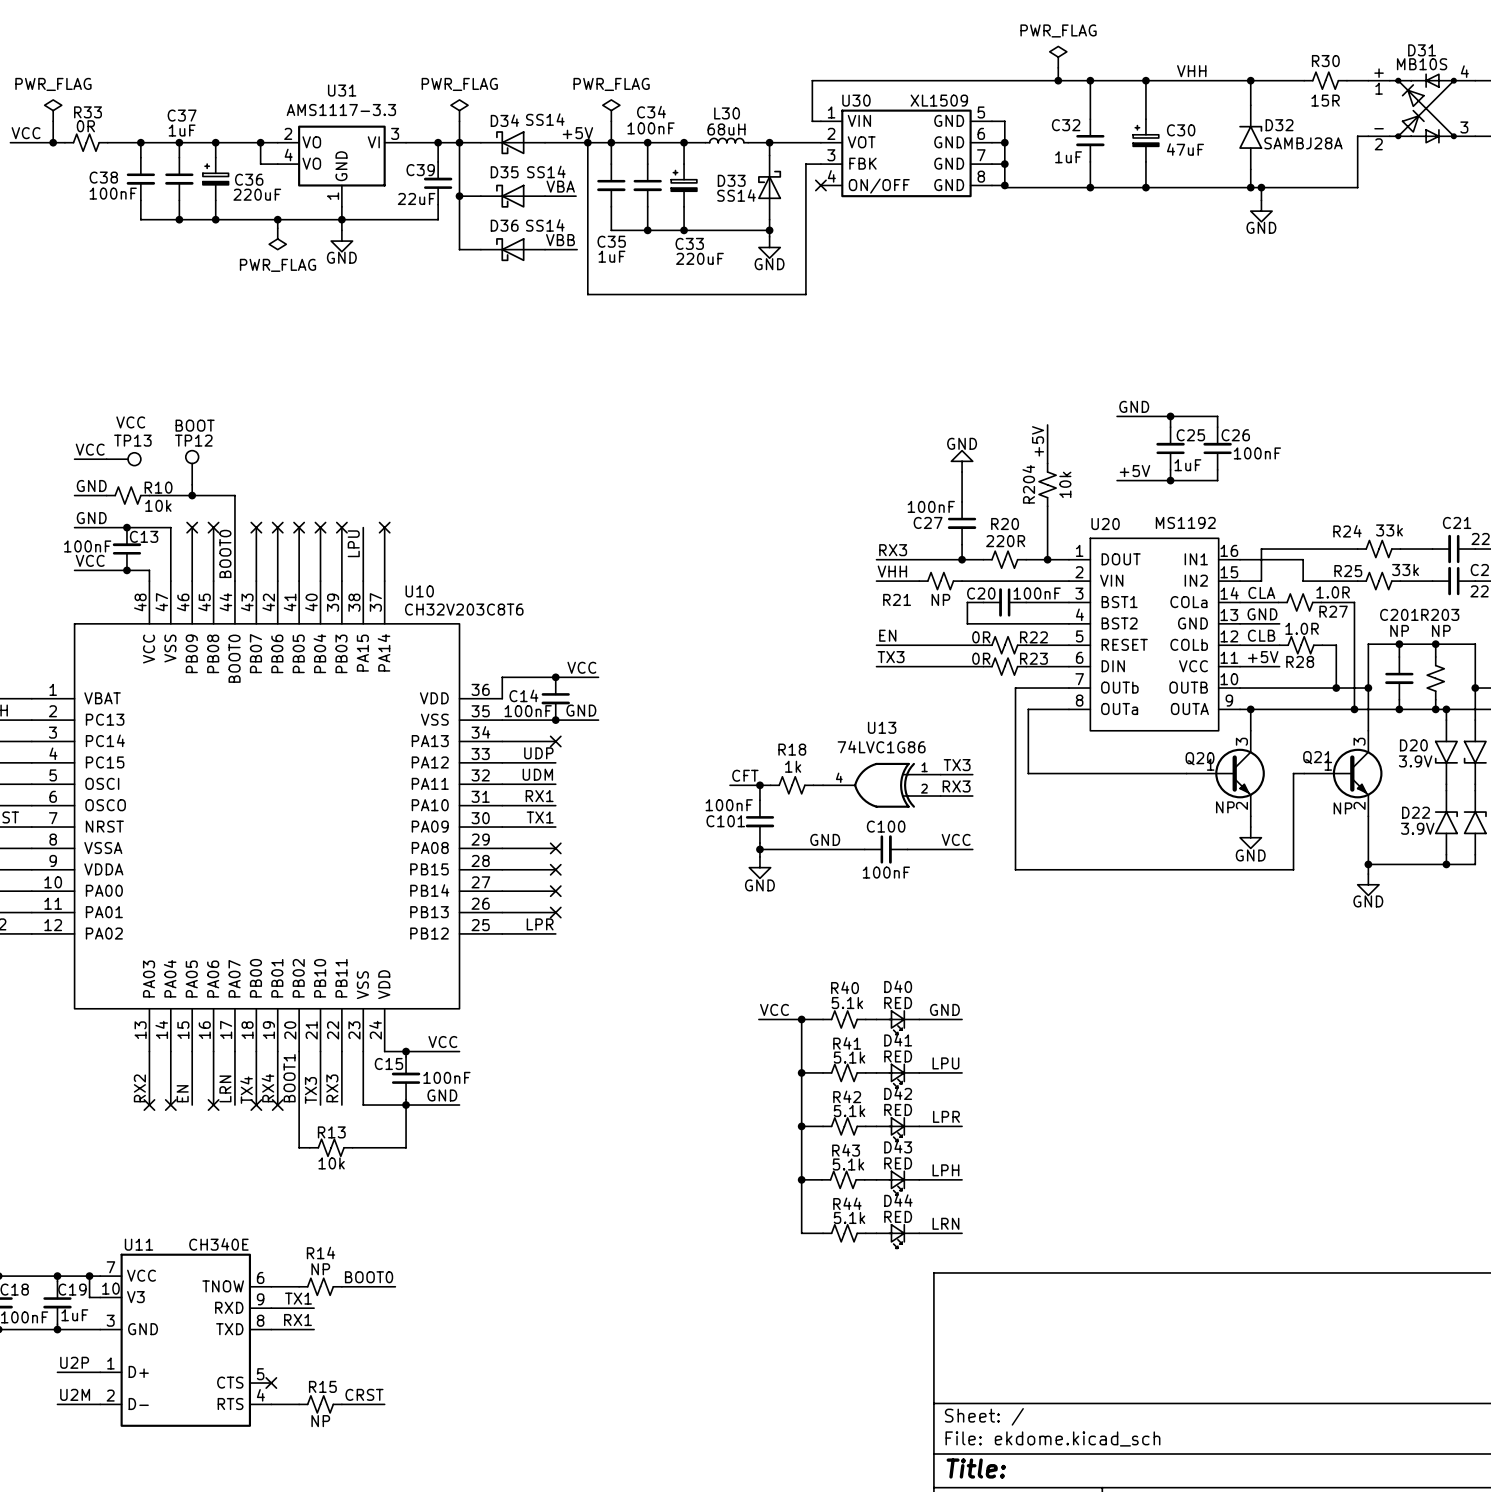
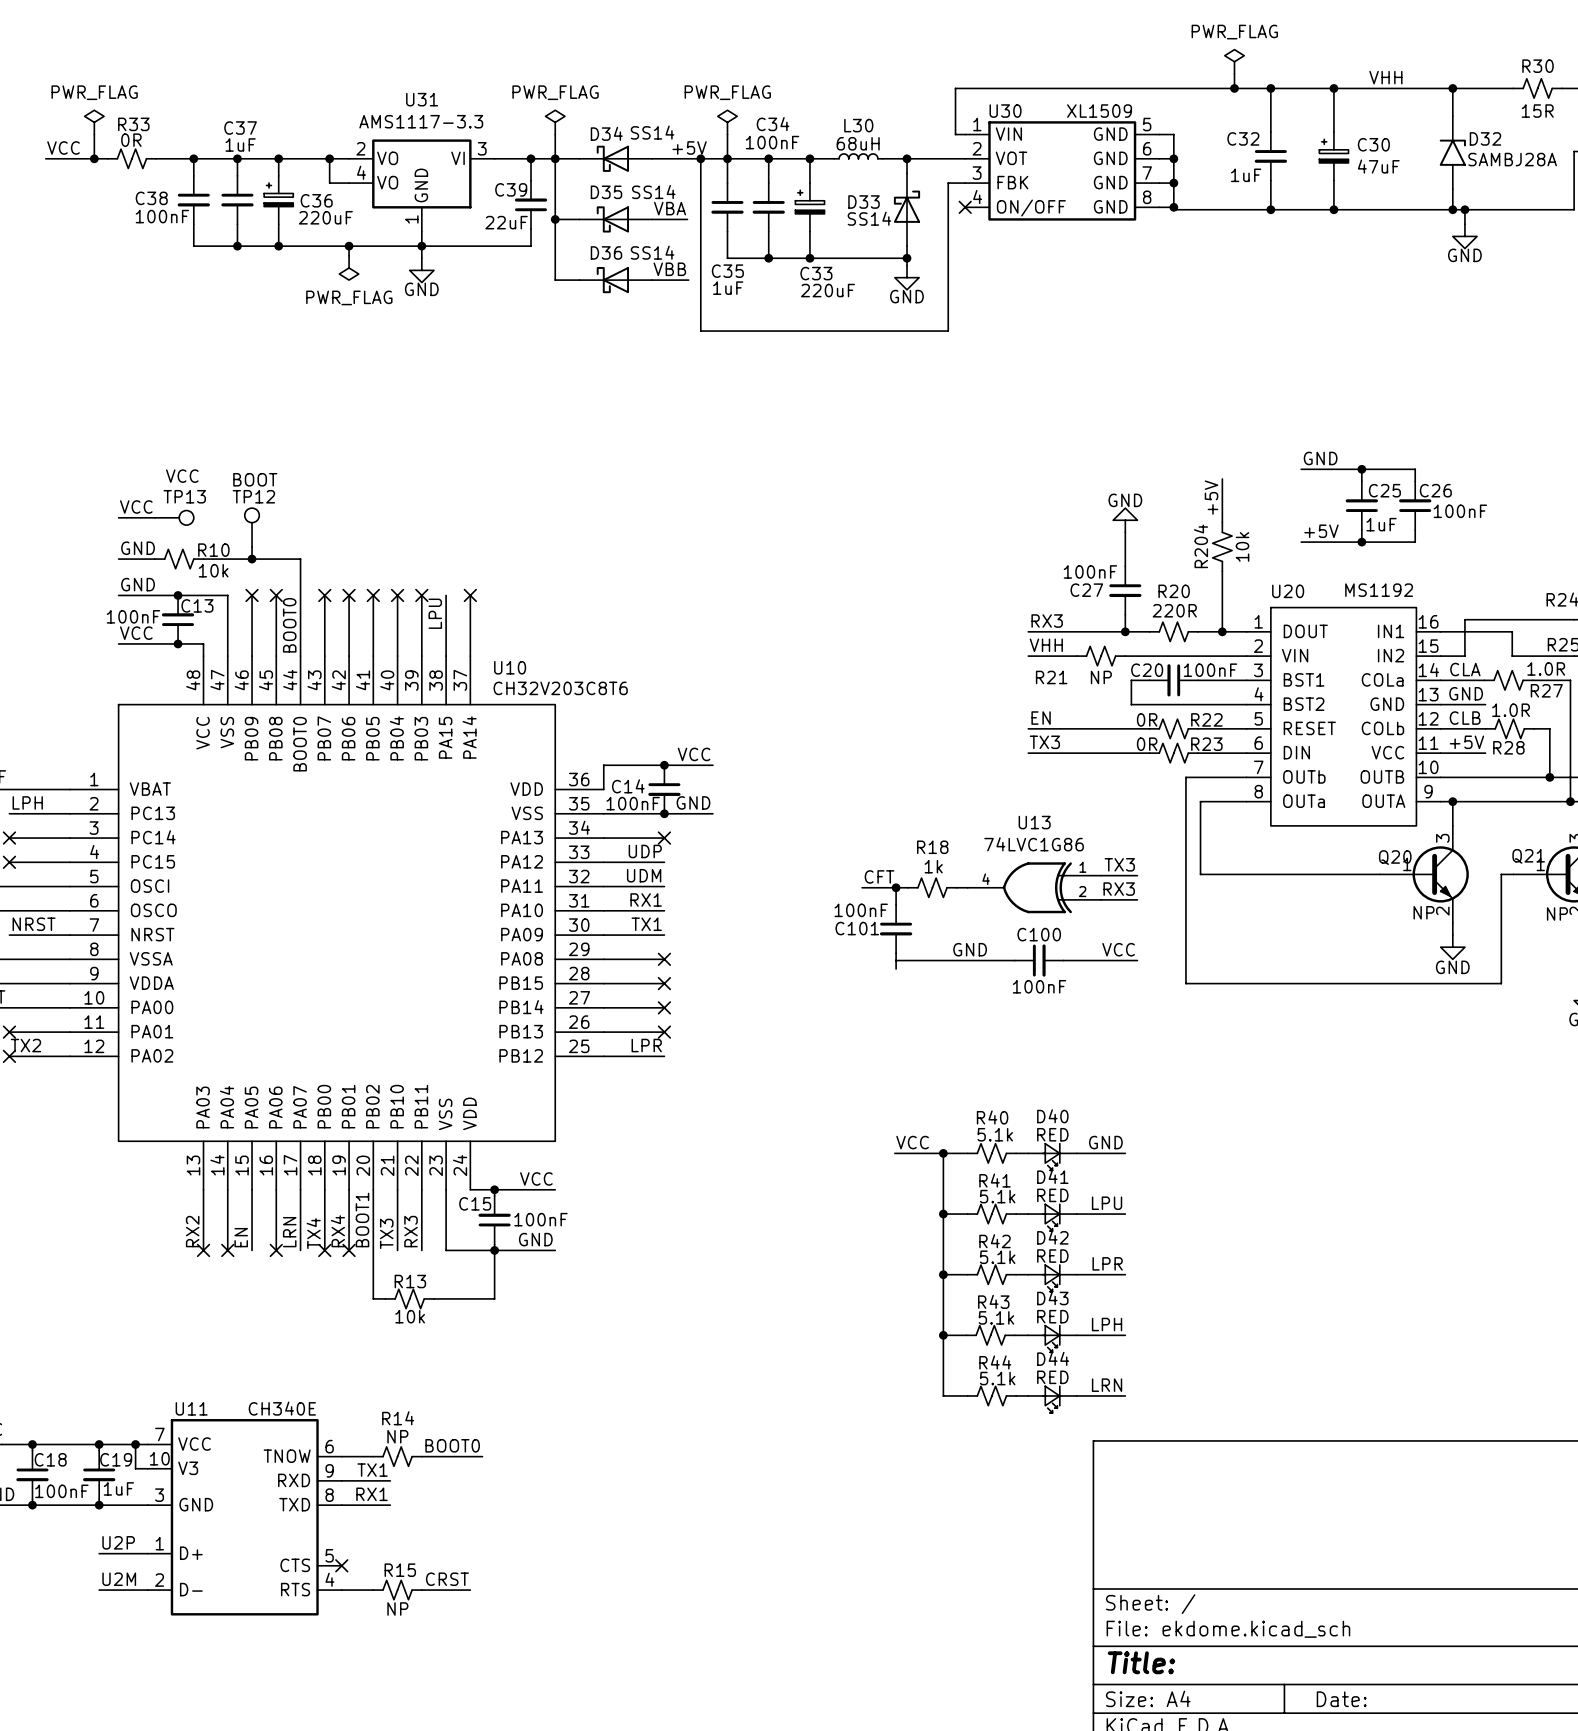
junction: (759, 849) -> none
power symbol: GND (759, 867) -> none

